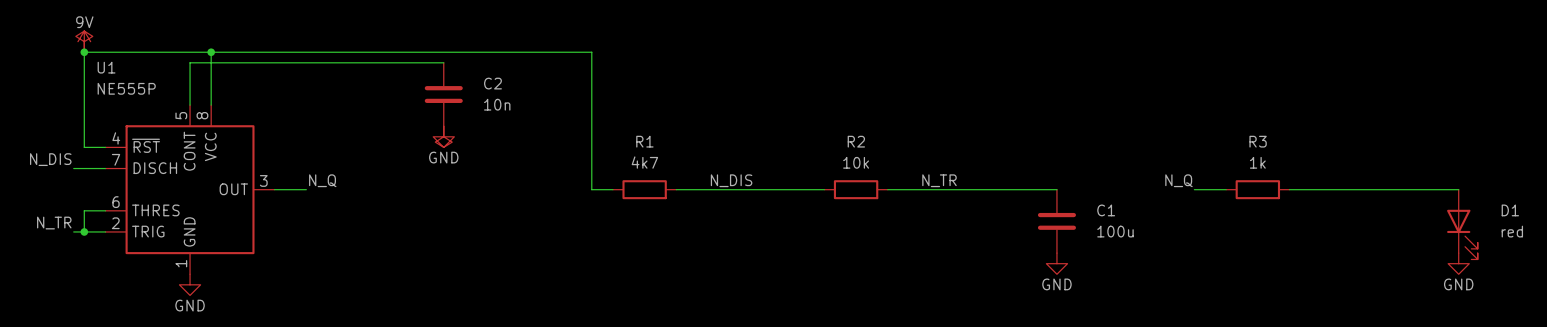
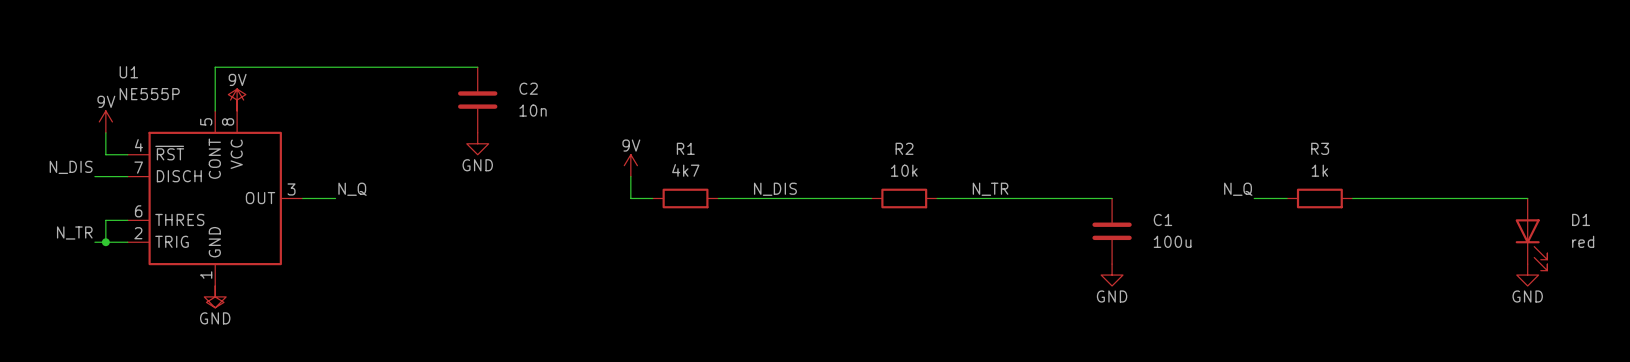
power symbol: (84, 41) -> none
power symbol: 9V (84, 41) -> none
junction: (84, 52) -> none
wire: (211, 52) (211, 105) -> none
junction: (211, 52) -> none
power symbol: none -> (237, 100)
power symbol: none -> 9V (237, 100)
power symbol: none -> 9V (105, 121)
wire: (84, 126) (84, 52) (591, 52) (591, 168) -> none
power symbol: (443, 136) -> none
power symbol: none -> 9V (630, 165)
power symbol: none -> (215, 296)

